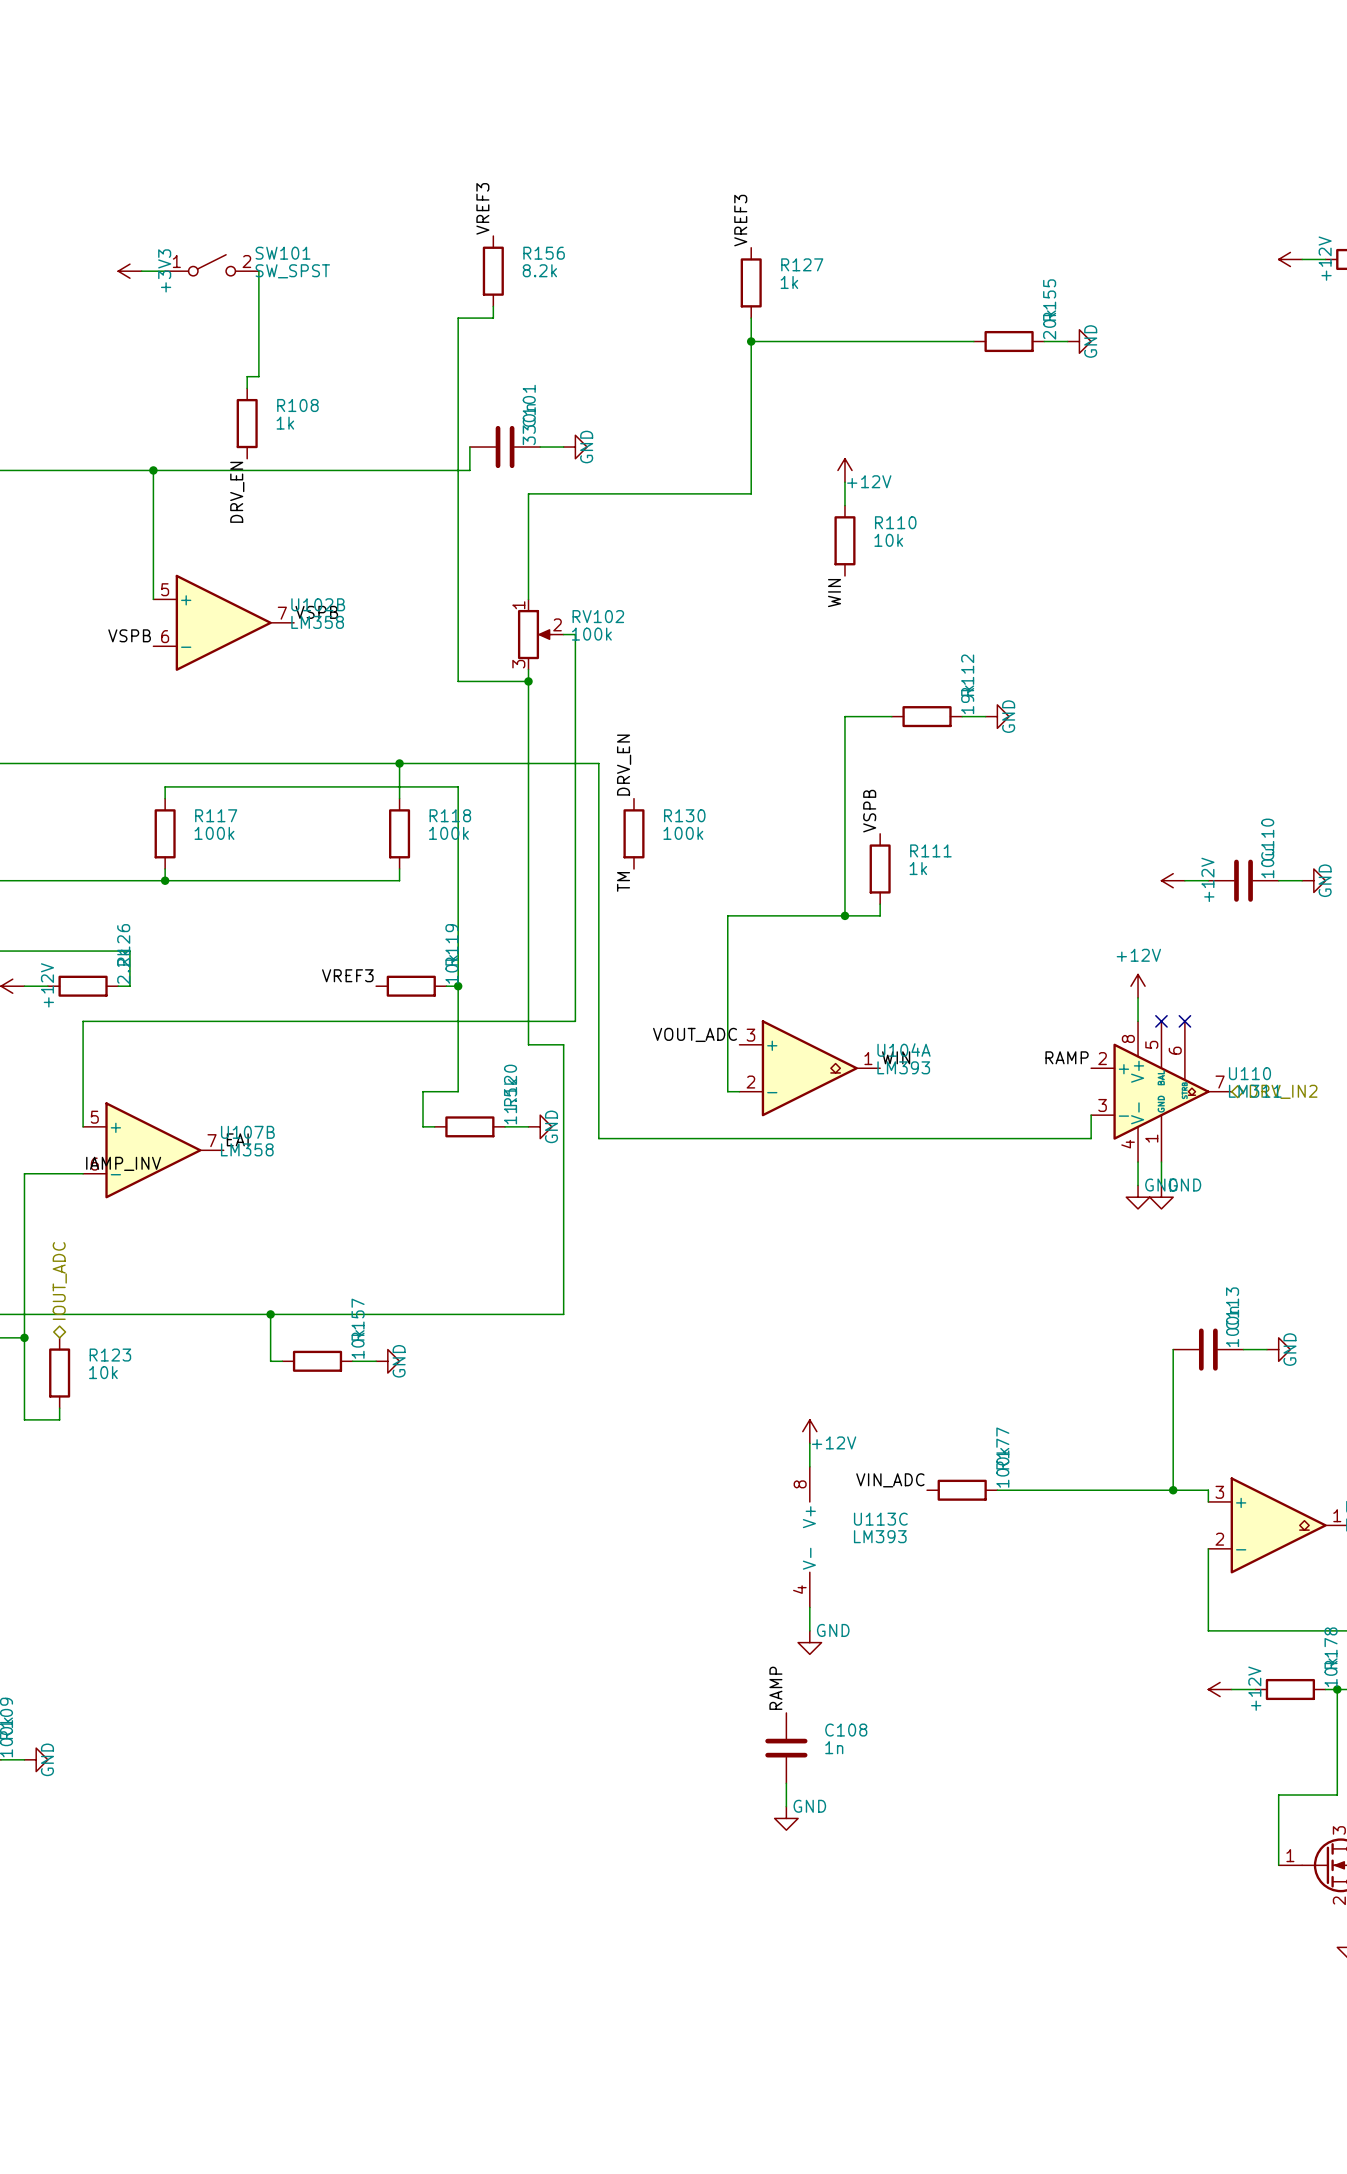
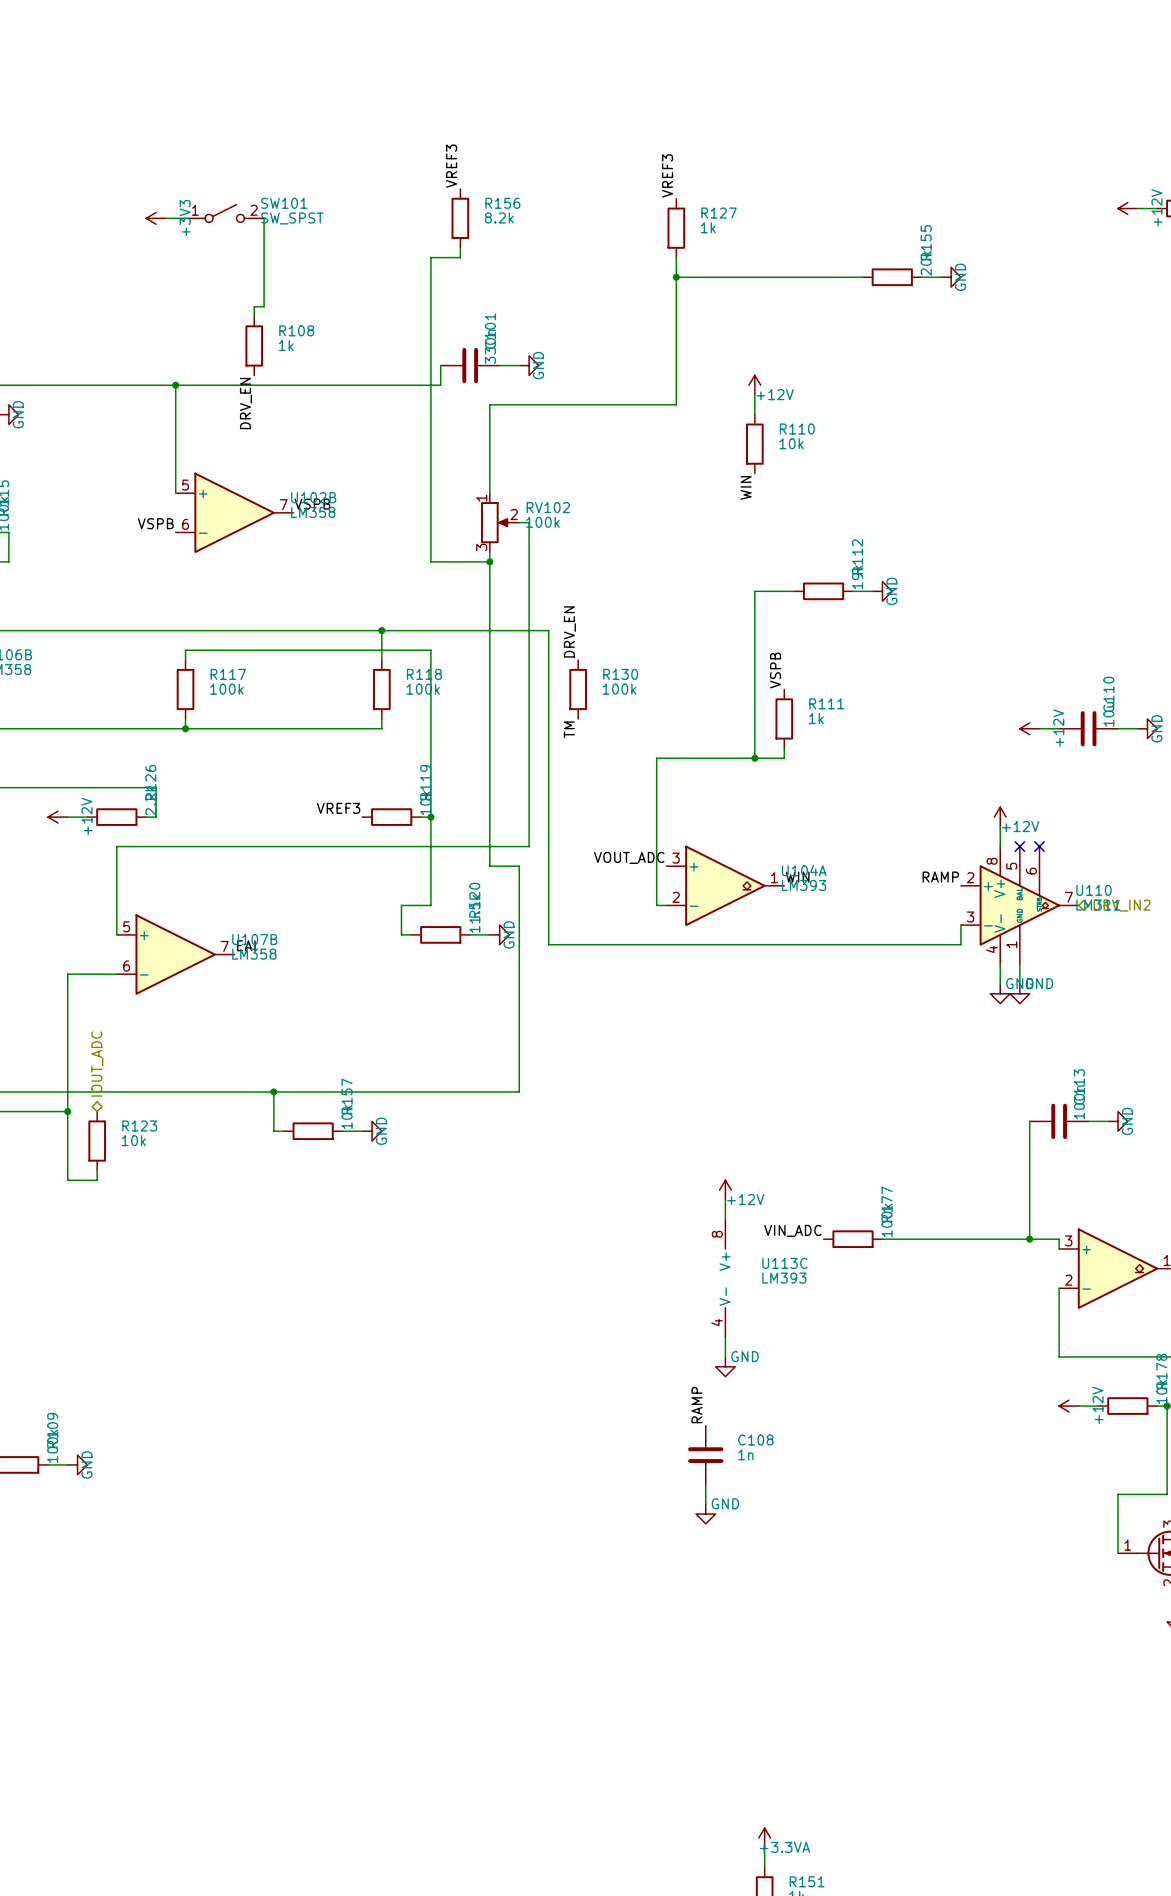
power symbol text position: +12V (1138, 955) -> +12V (1020, 826)
label: IAMP_INV (123, 1163) -> none

